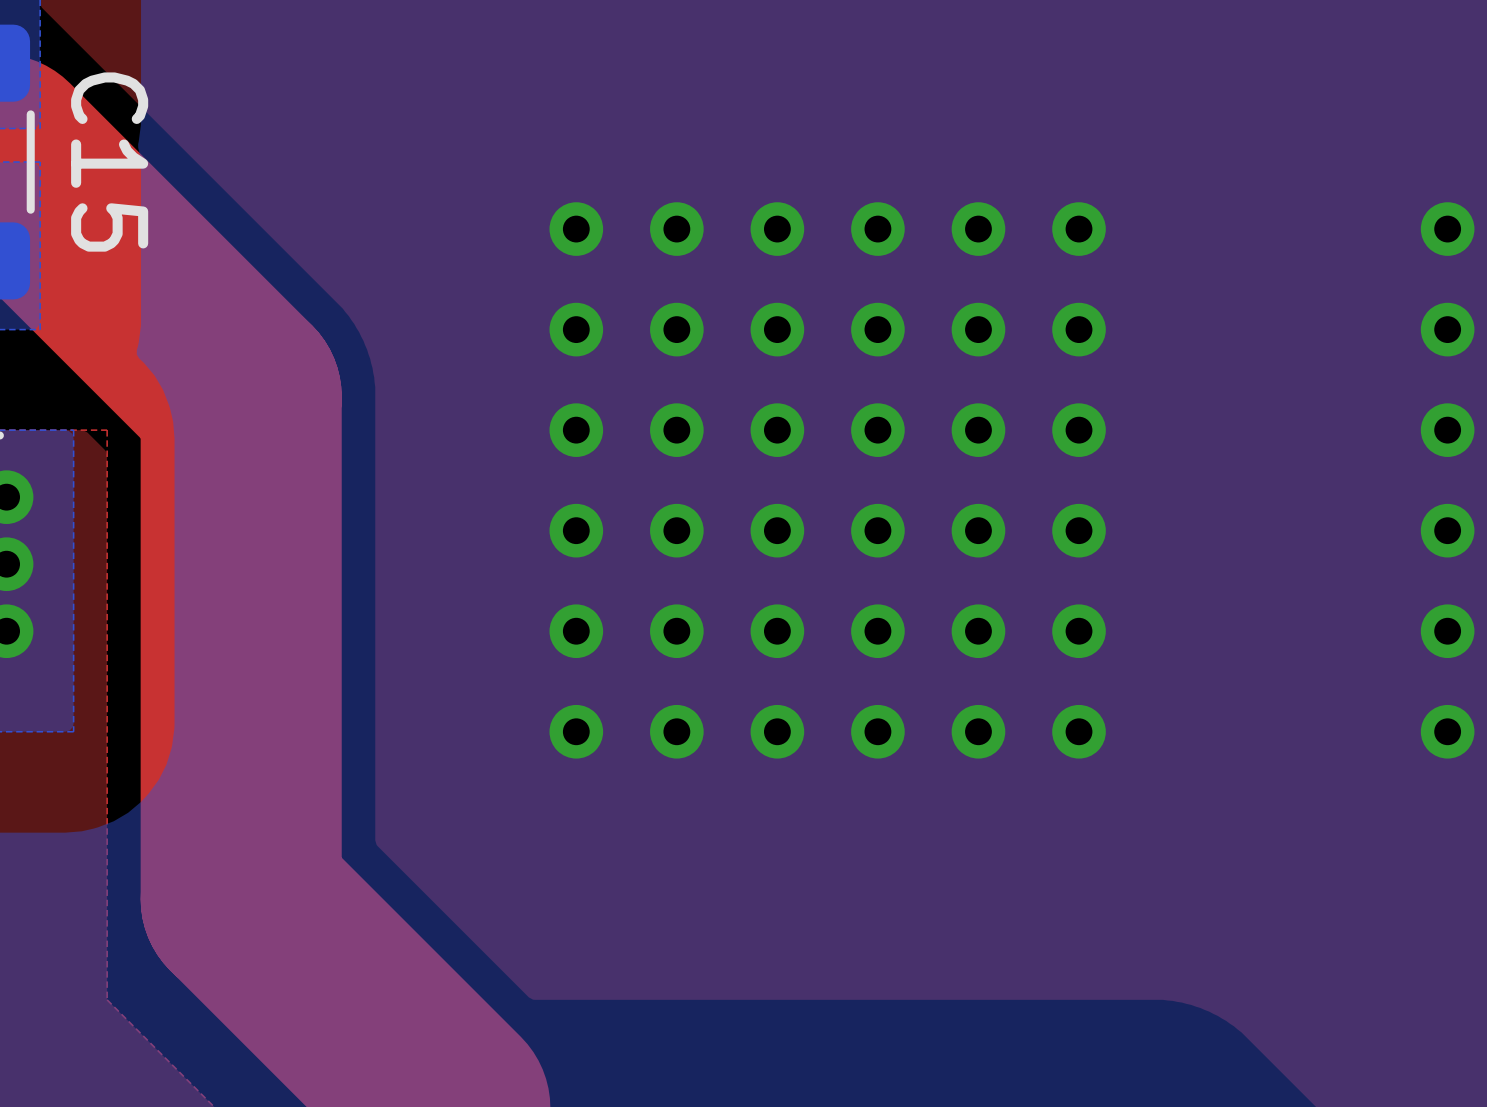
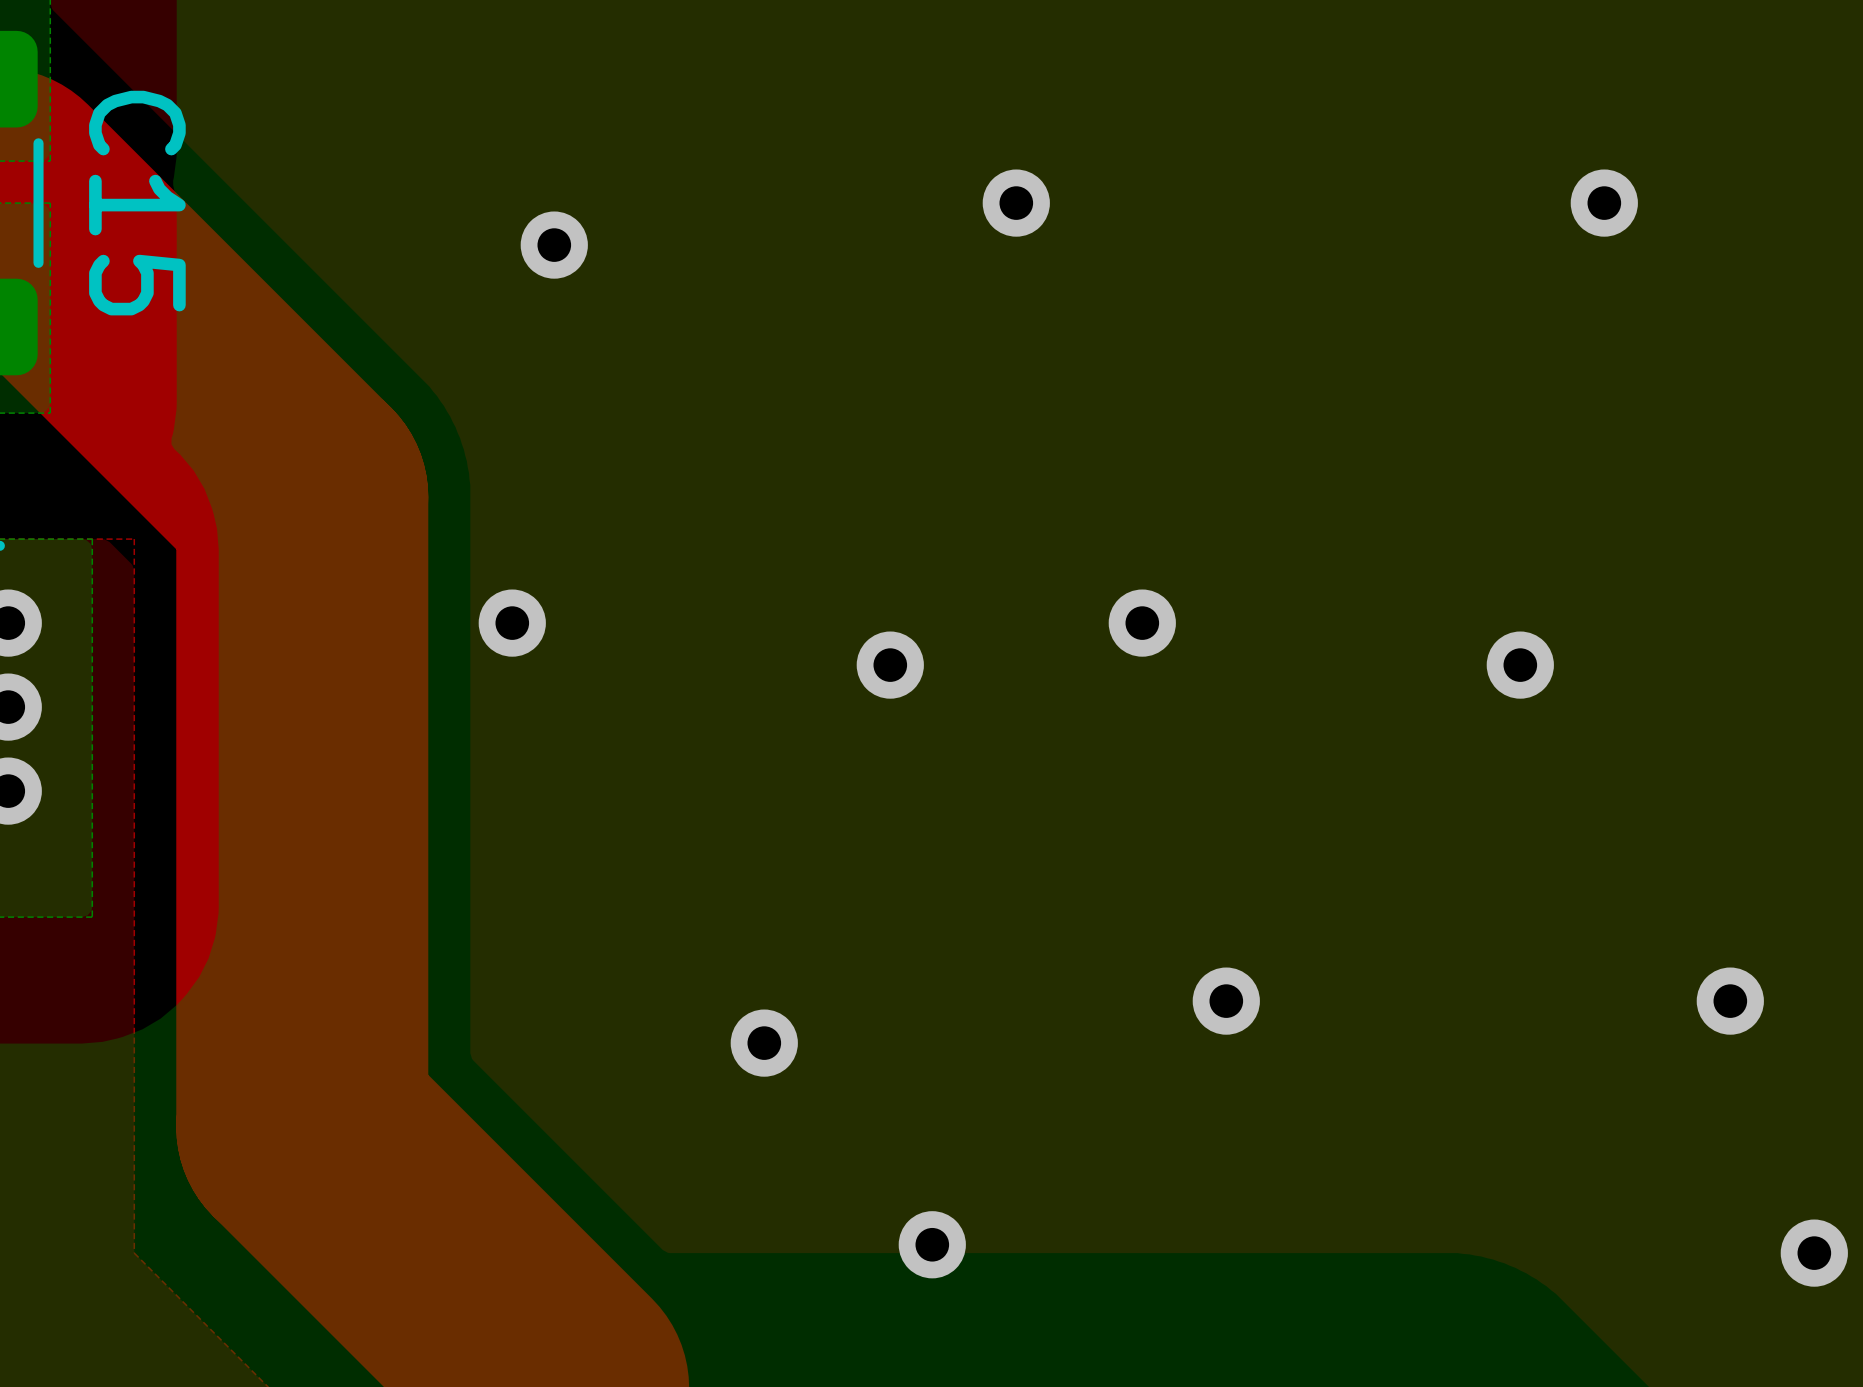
via: none -> (1016, 203)
via: none -> (1604, 203)
via: none -> (554, 245)
via: (576, 229) -> none
via: (676, 229) -> none
via: (777, 229) -> none
via: (877, 229) -> none
via: (978, 229) -> none
via: (1079, 229) -> none
via: (1447, 229) -> none
via: (576, 329) -> none
via: (676, 329) -> none
via: (777, 329) -> none
via: (877, 329) -> none
via: (978, 329) -> none
via: (1079, 329) -> none
via: (1447, 329) -> none
via: (576, 430) -> none
via: (676, 430) -> none
via: (777, 430) -> none
via: (877, 430) -> none
via: (978, 430) -> none
via: (1079, 430) -> none
via: (1447, 430) -> none
via: none -> (512, 623)
via: (576, 530) -> none
via position: (676, 530) -> (890, 665)
via: (777, 530) -> none
via position: (877, 530) -> (1142, 623)
via: (978, 530) -> none
via: (1079, 530) -> none
via: none -> (1520, 665)
via: (1447, 530) -> none
via: (576, 631) -> none
via: (676, 631) -> none
via: (777, 631) -> none
via: (877, 631) -> none
via: (978, 631) -> none
via: (1079, 631) -> none
via: (1447, 631) -> none
via: (576, 731) -> none
via: (676, 731) -> none
via: (777, 731) -> none
via: (877, 731) -> none
via: (978, 731) -> none
via: (1079, 731) -> none
via: (1447, 731) -> none
via: none -> (1226, 1001)
via: none -> (1730, 1001)
via: none -> (764, 1043)
via: none -> (932, 1244)
via: none -> (1814, 1253)

